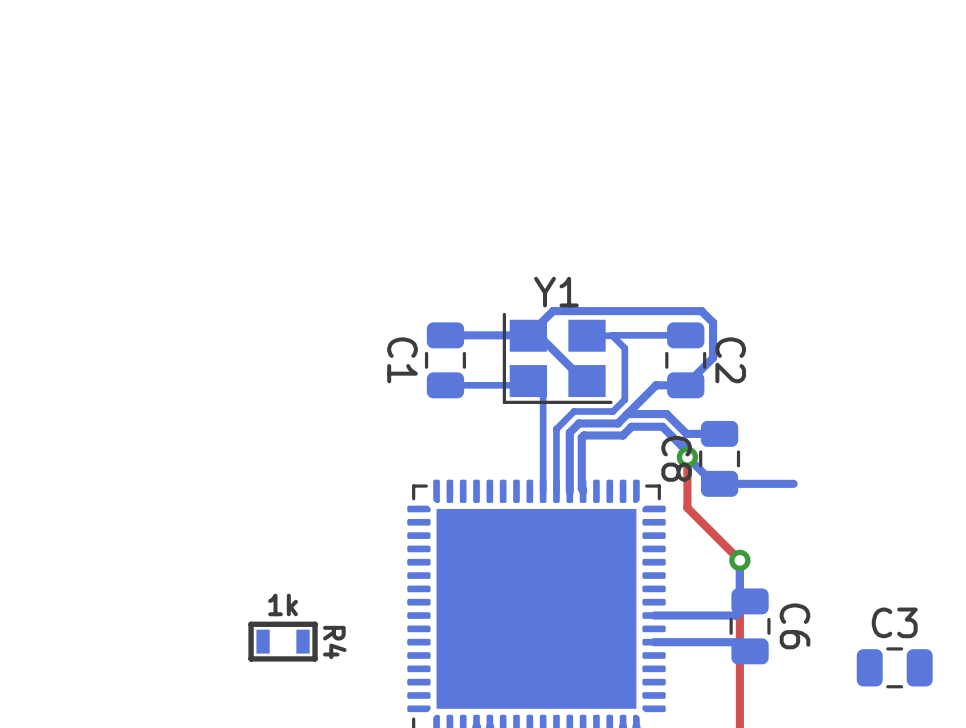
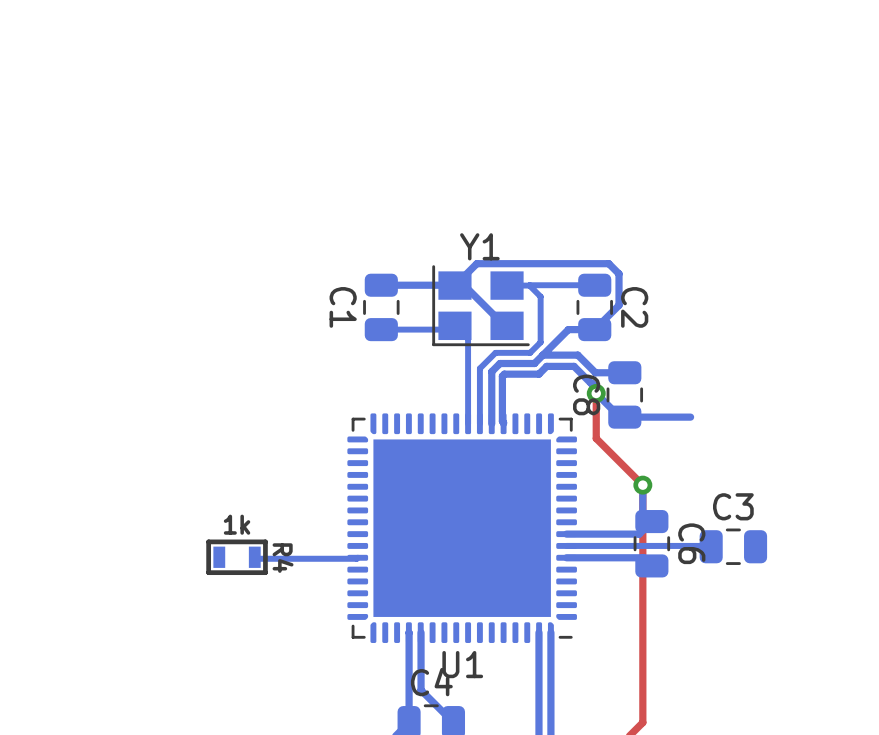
bottom track: none -> (566, 545) (711, 546)
bottom track: none -> (357, 557) (255, 558)
C3 position: (894, 667) -> (733, 546)

